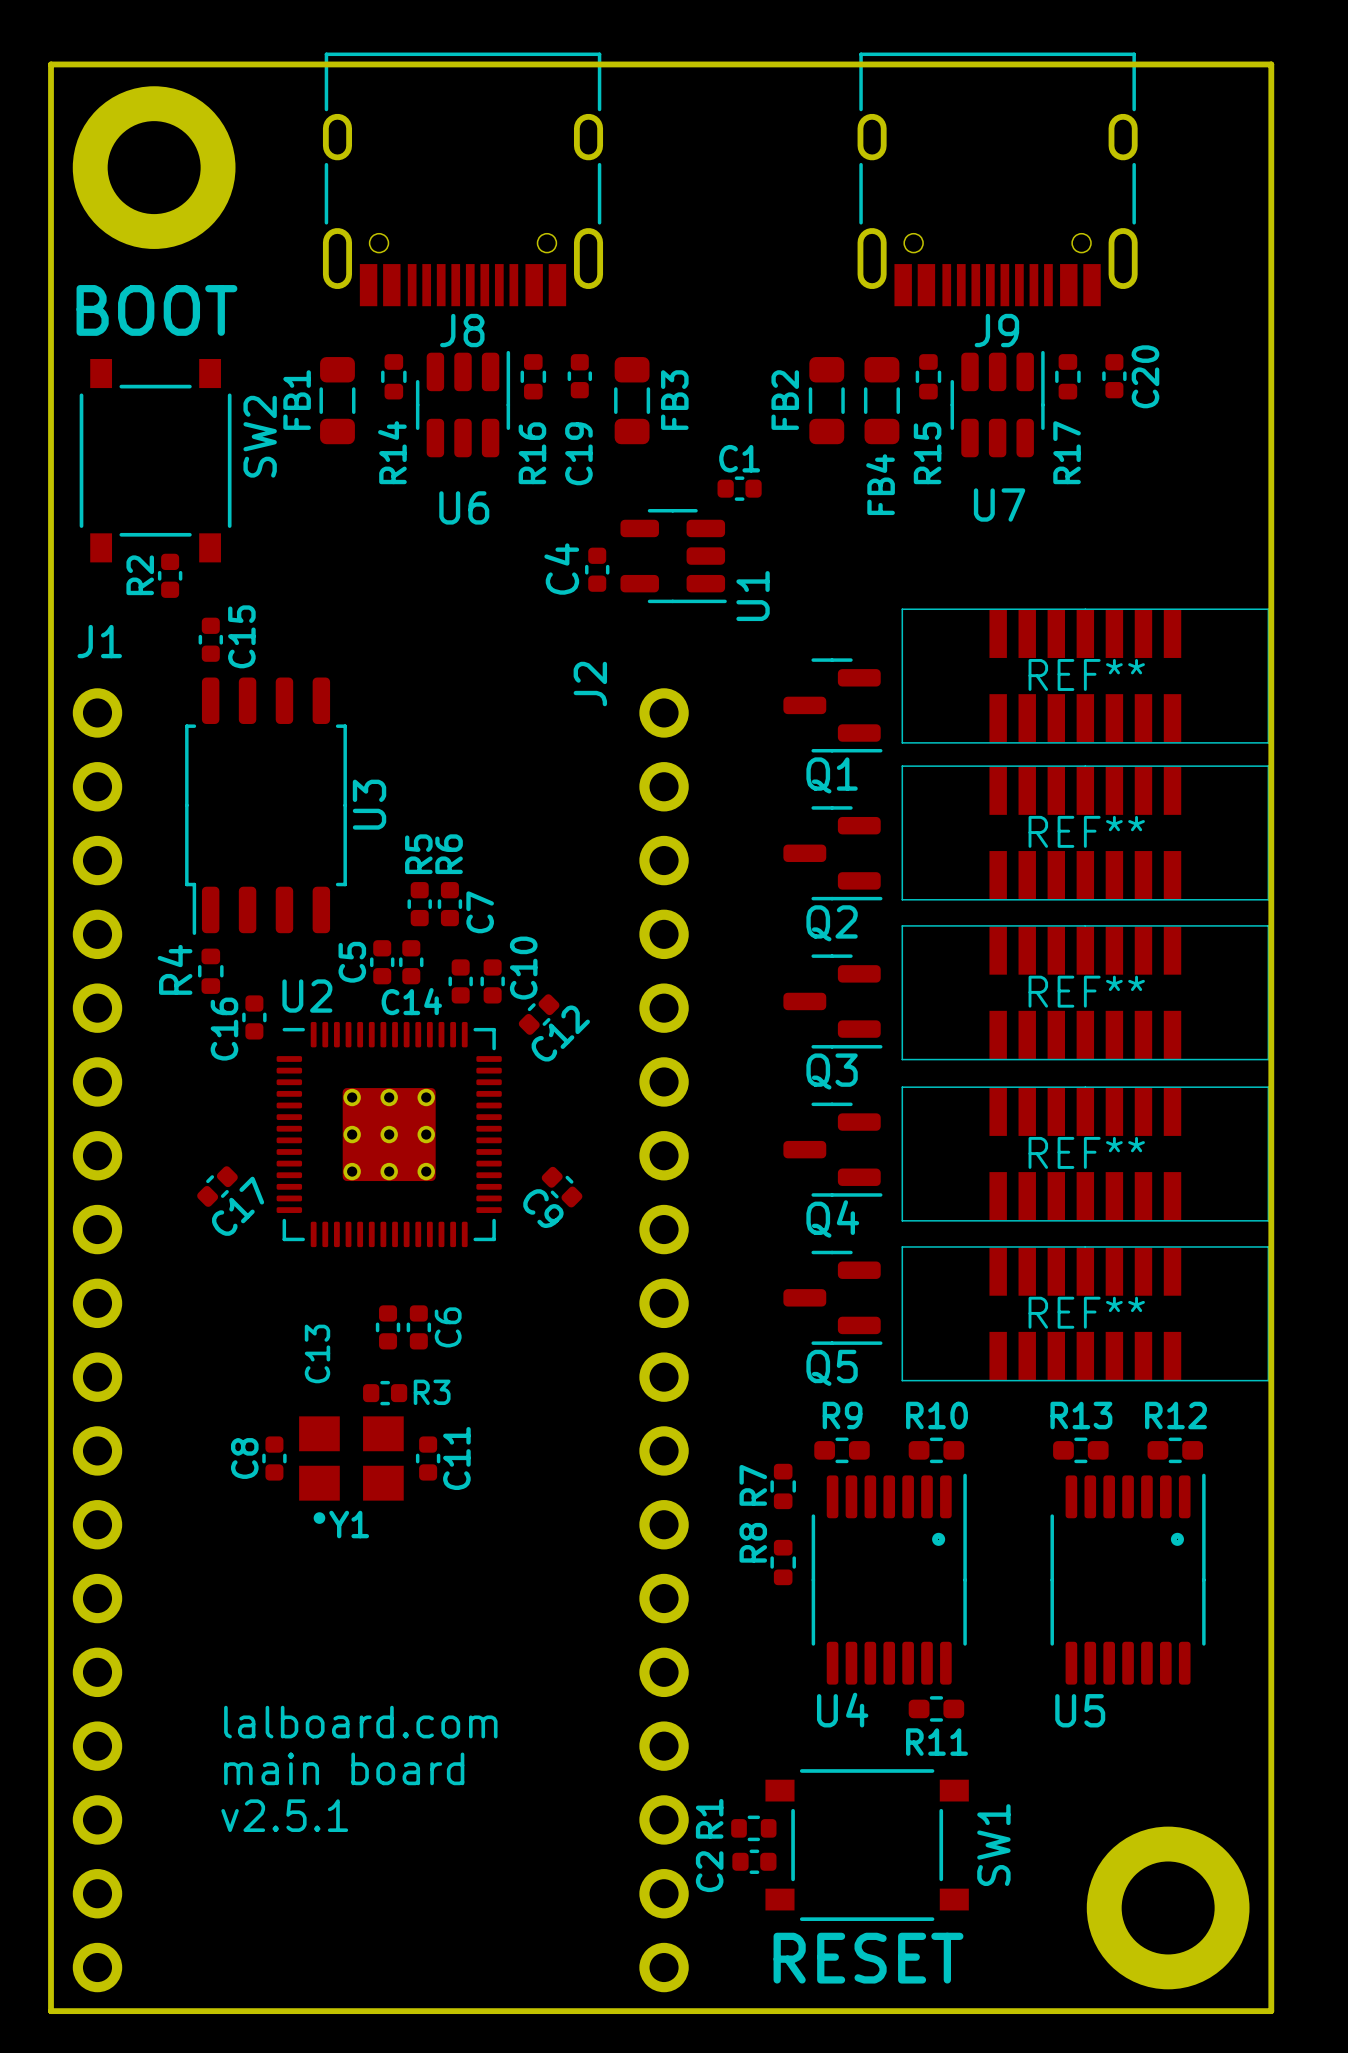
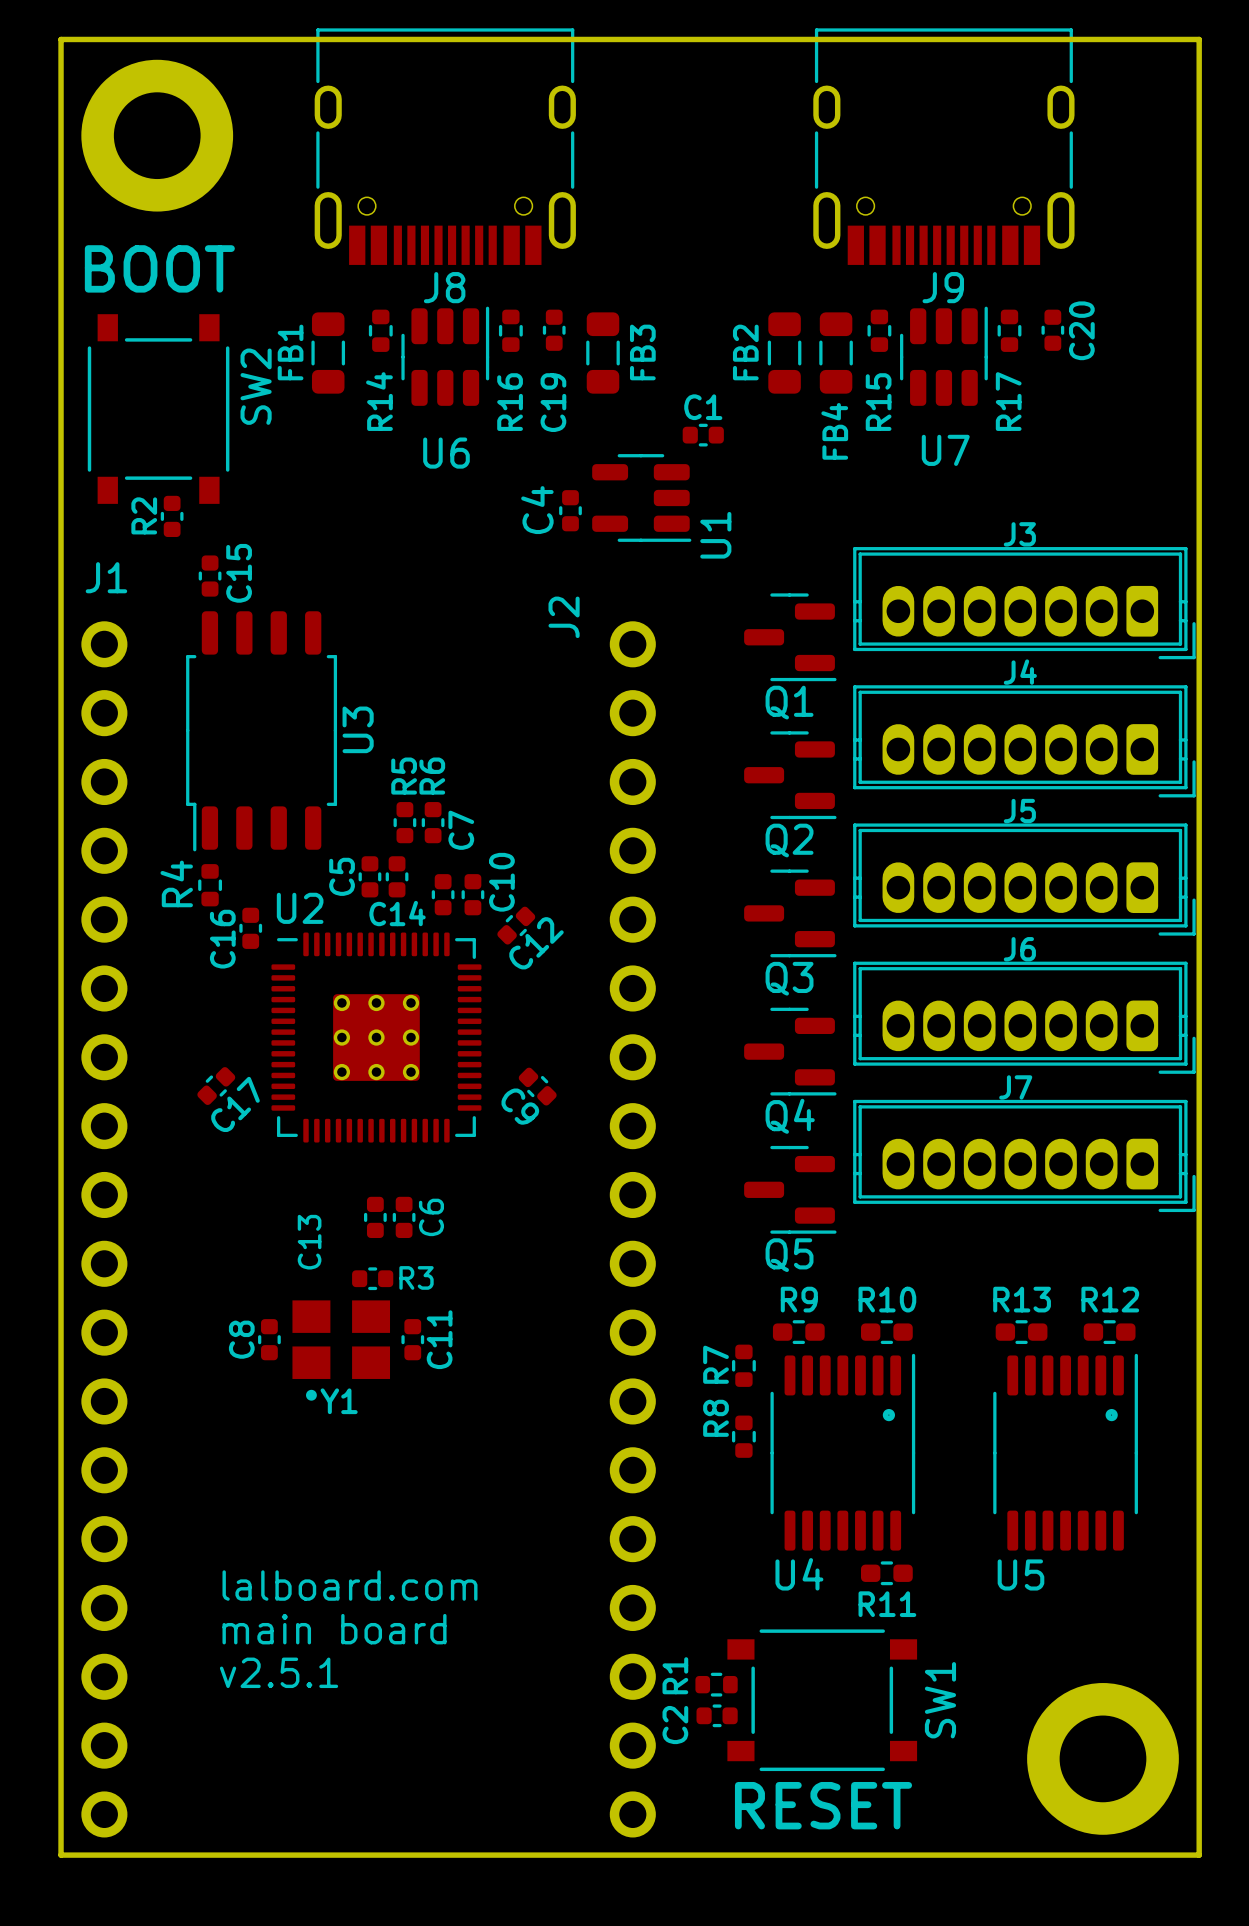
J3: none -> (1024, 603)
REF**: (1085, 676) -> none
J4: none -> (1024, 741)
REF**: (1085, 832) -> none
J5: none -> (1024, 879)
REF**: (1085, 992) -> none
J6: none -> (1024, 1017)
REF**: (1085, 1154) -> none
J7: none -> (1024, 1155)
REF**: (1085, 1313) -> none

